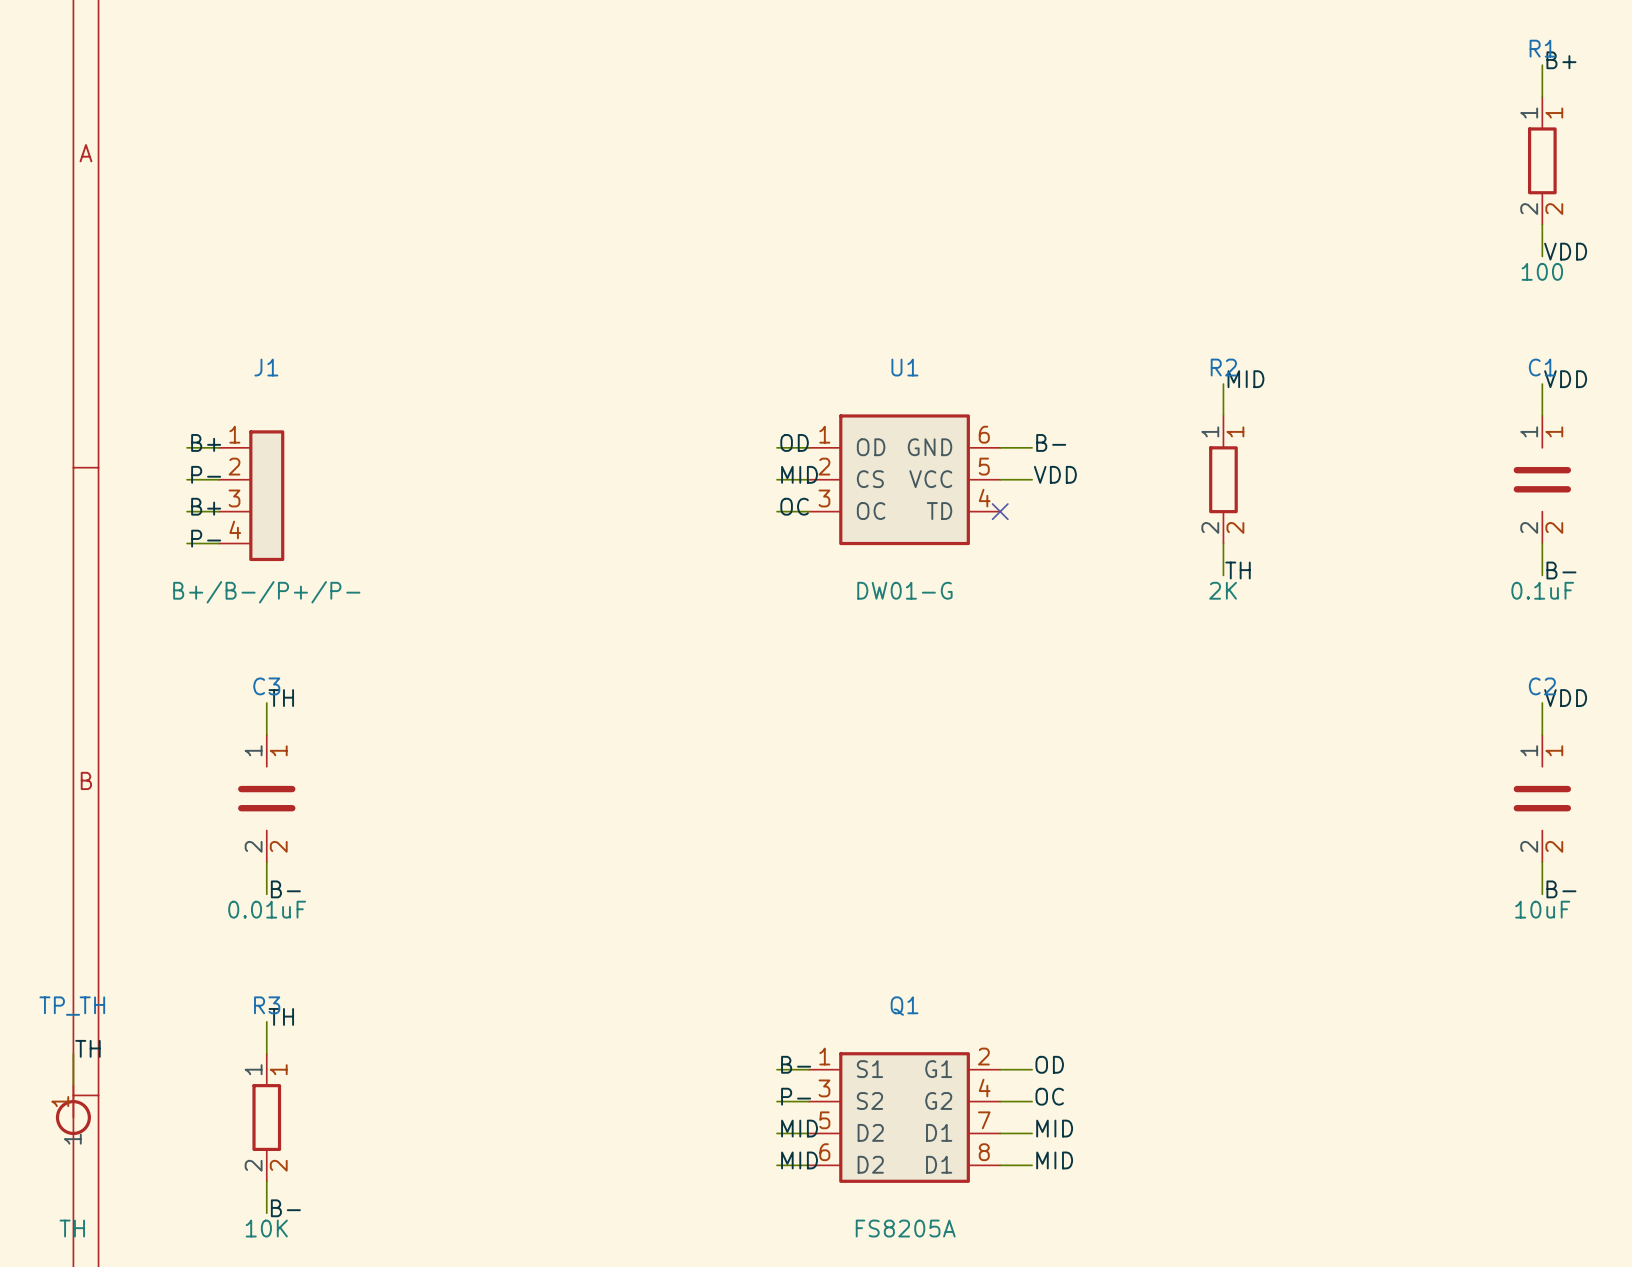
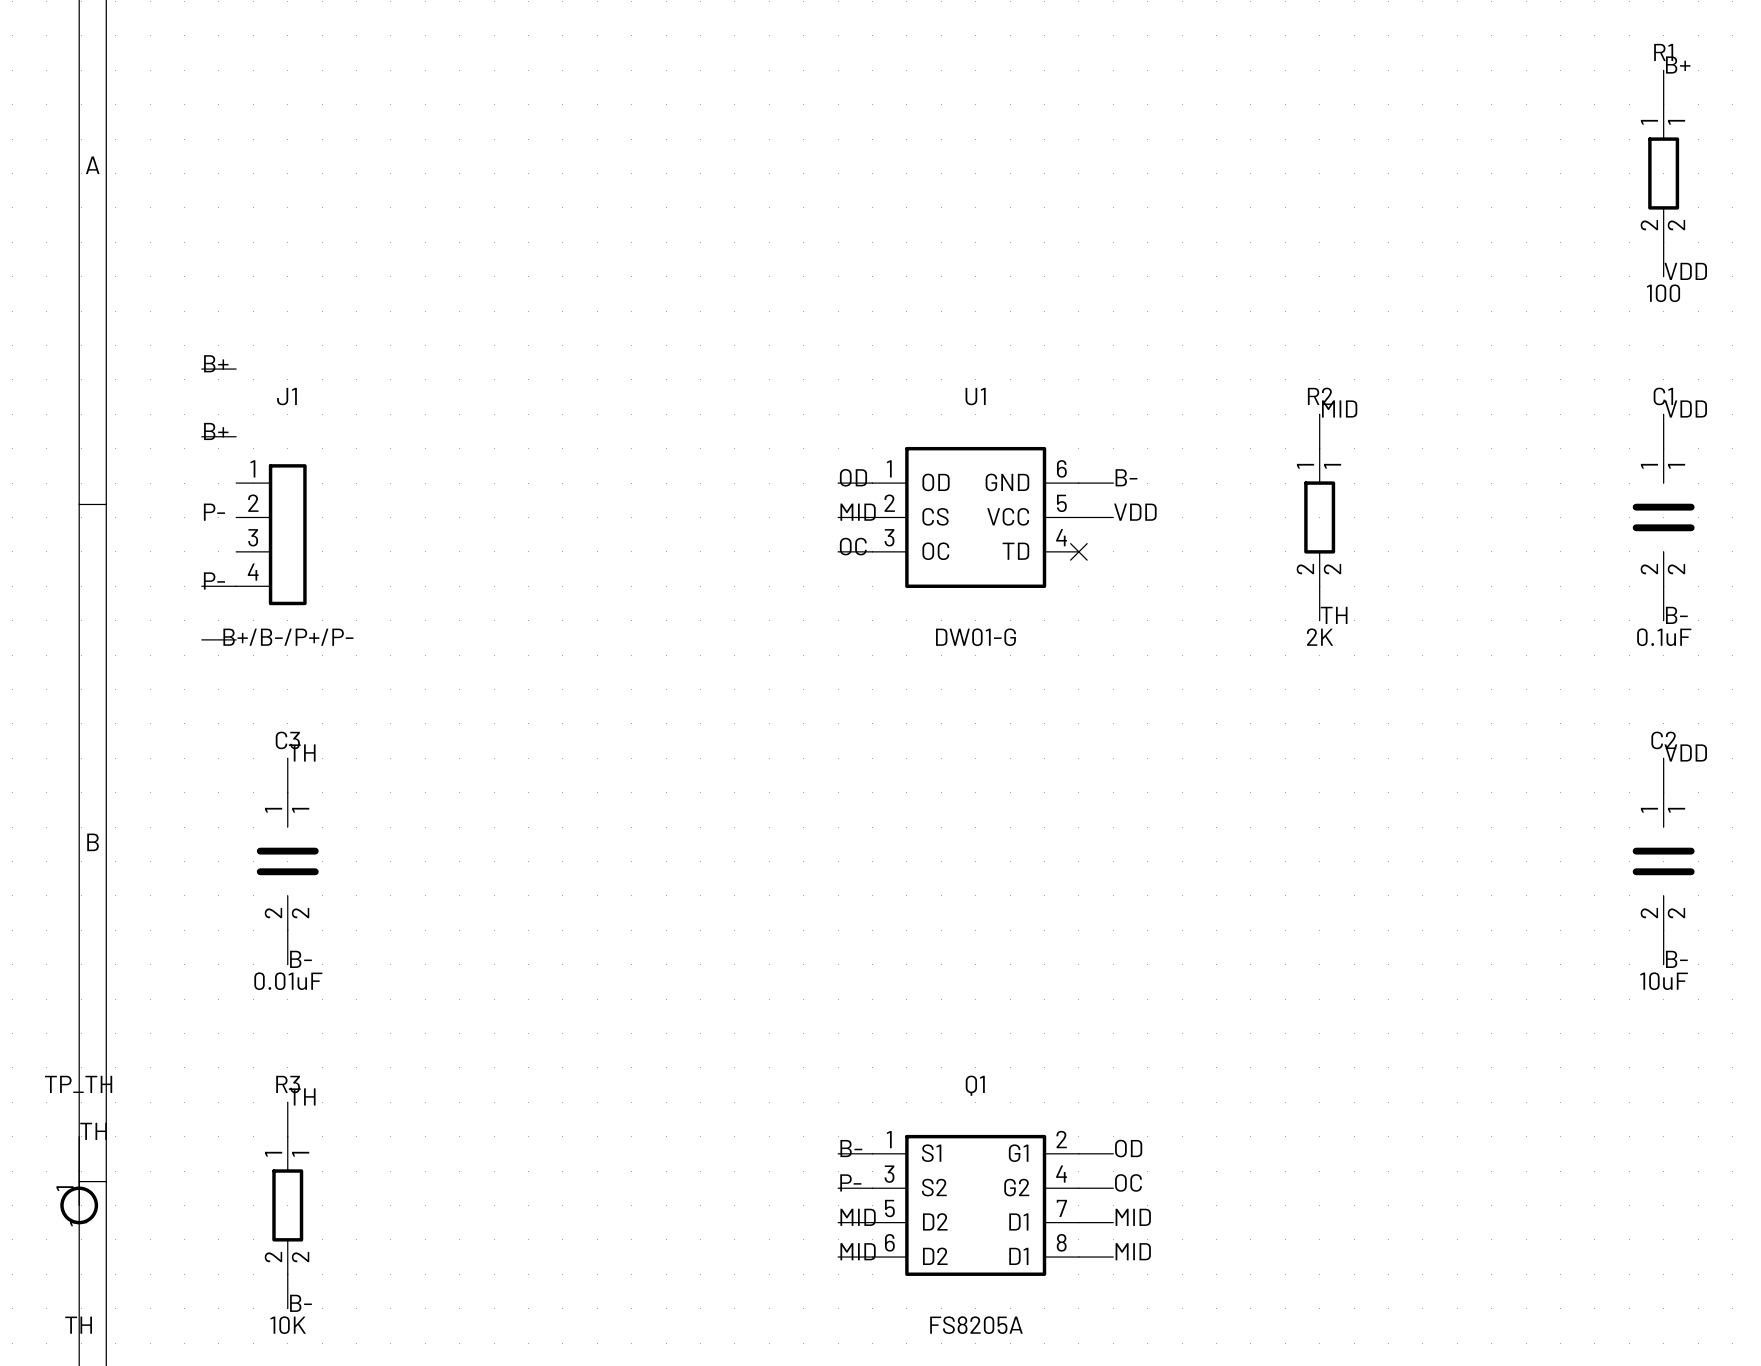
label: none -> B+ (216, 363)
label position: B+ (206, 442) -> B+ (216, 431)
wire: (187, 447) (218, 447) -> (201, 436) (236, 436)
wire: (187, 479) (218, 479) -> (201, 369) (236, 369)
label: B+ (206, 506) -> none
wire: (187, 511) (218, 511) -> (201, 639) (236, 639)

